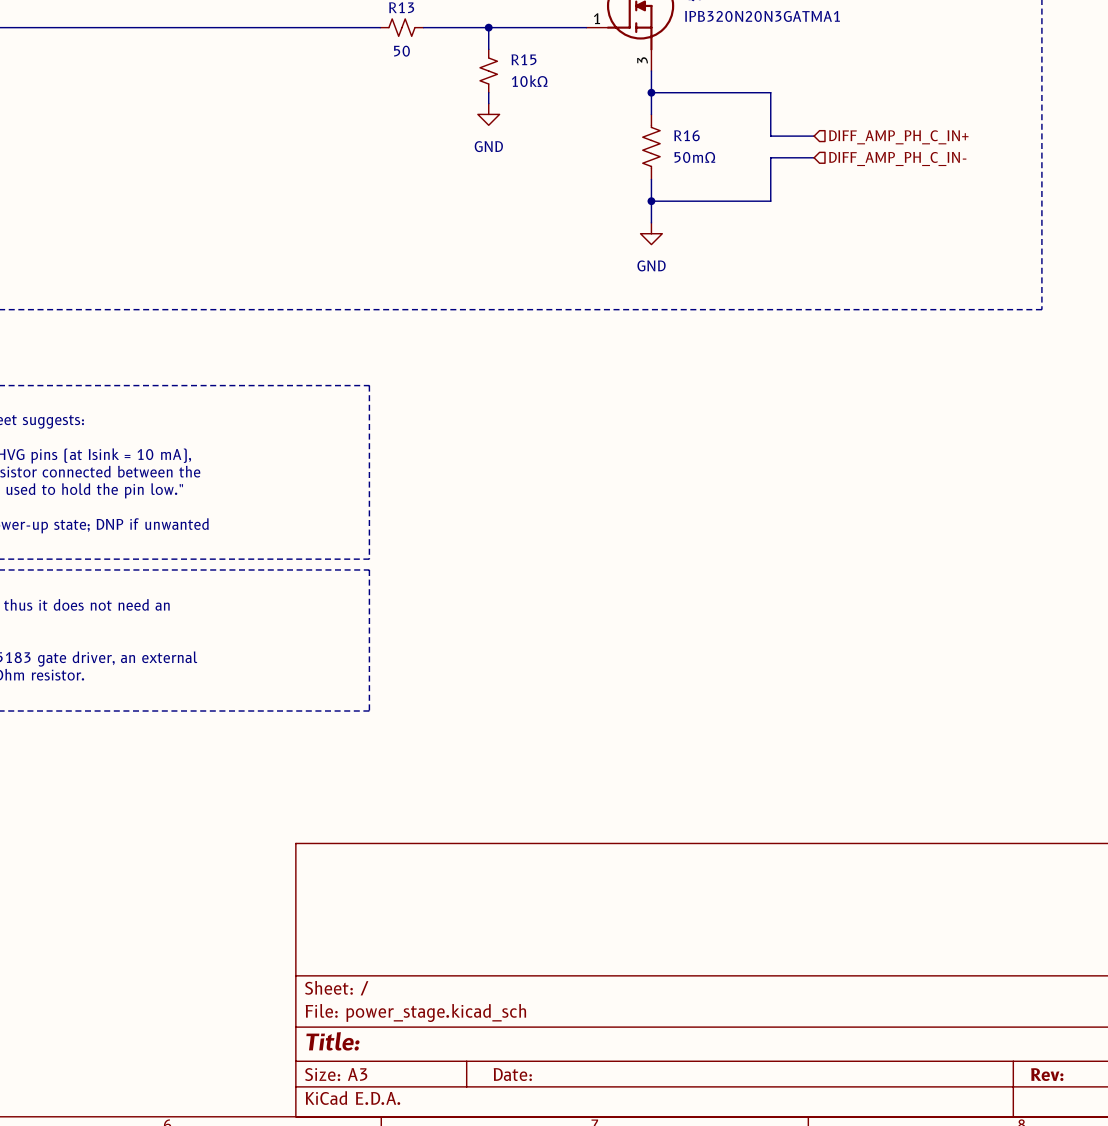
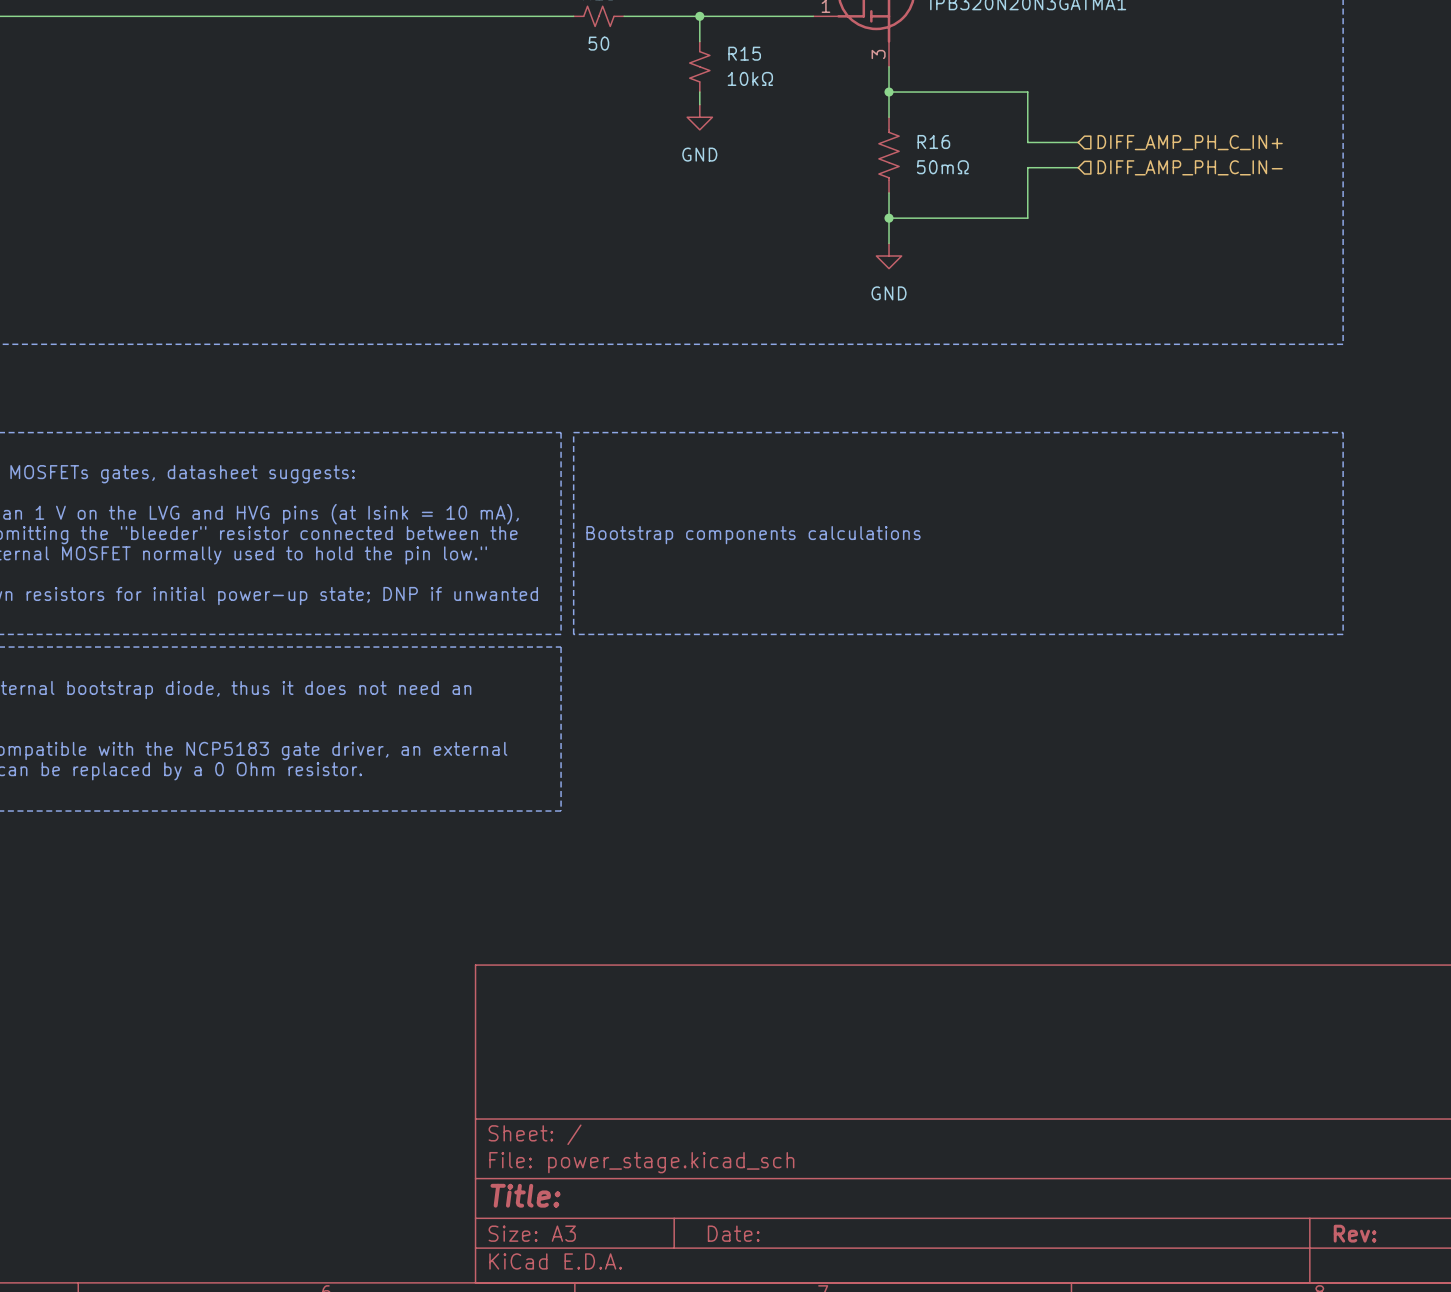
line: none -> (573, 432) (1343, 432) (1343, 634) (573, 634) (573, 432)
text: none -> Bootstrap components calculations (753, 535)

